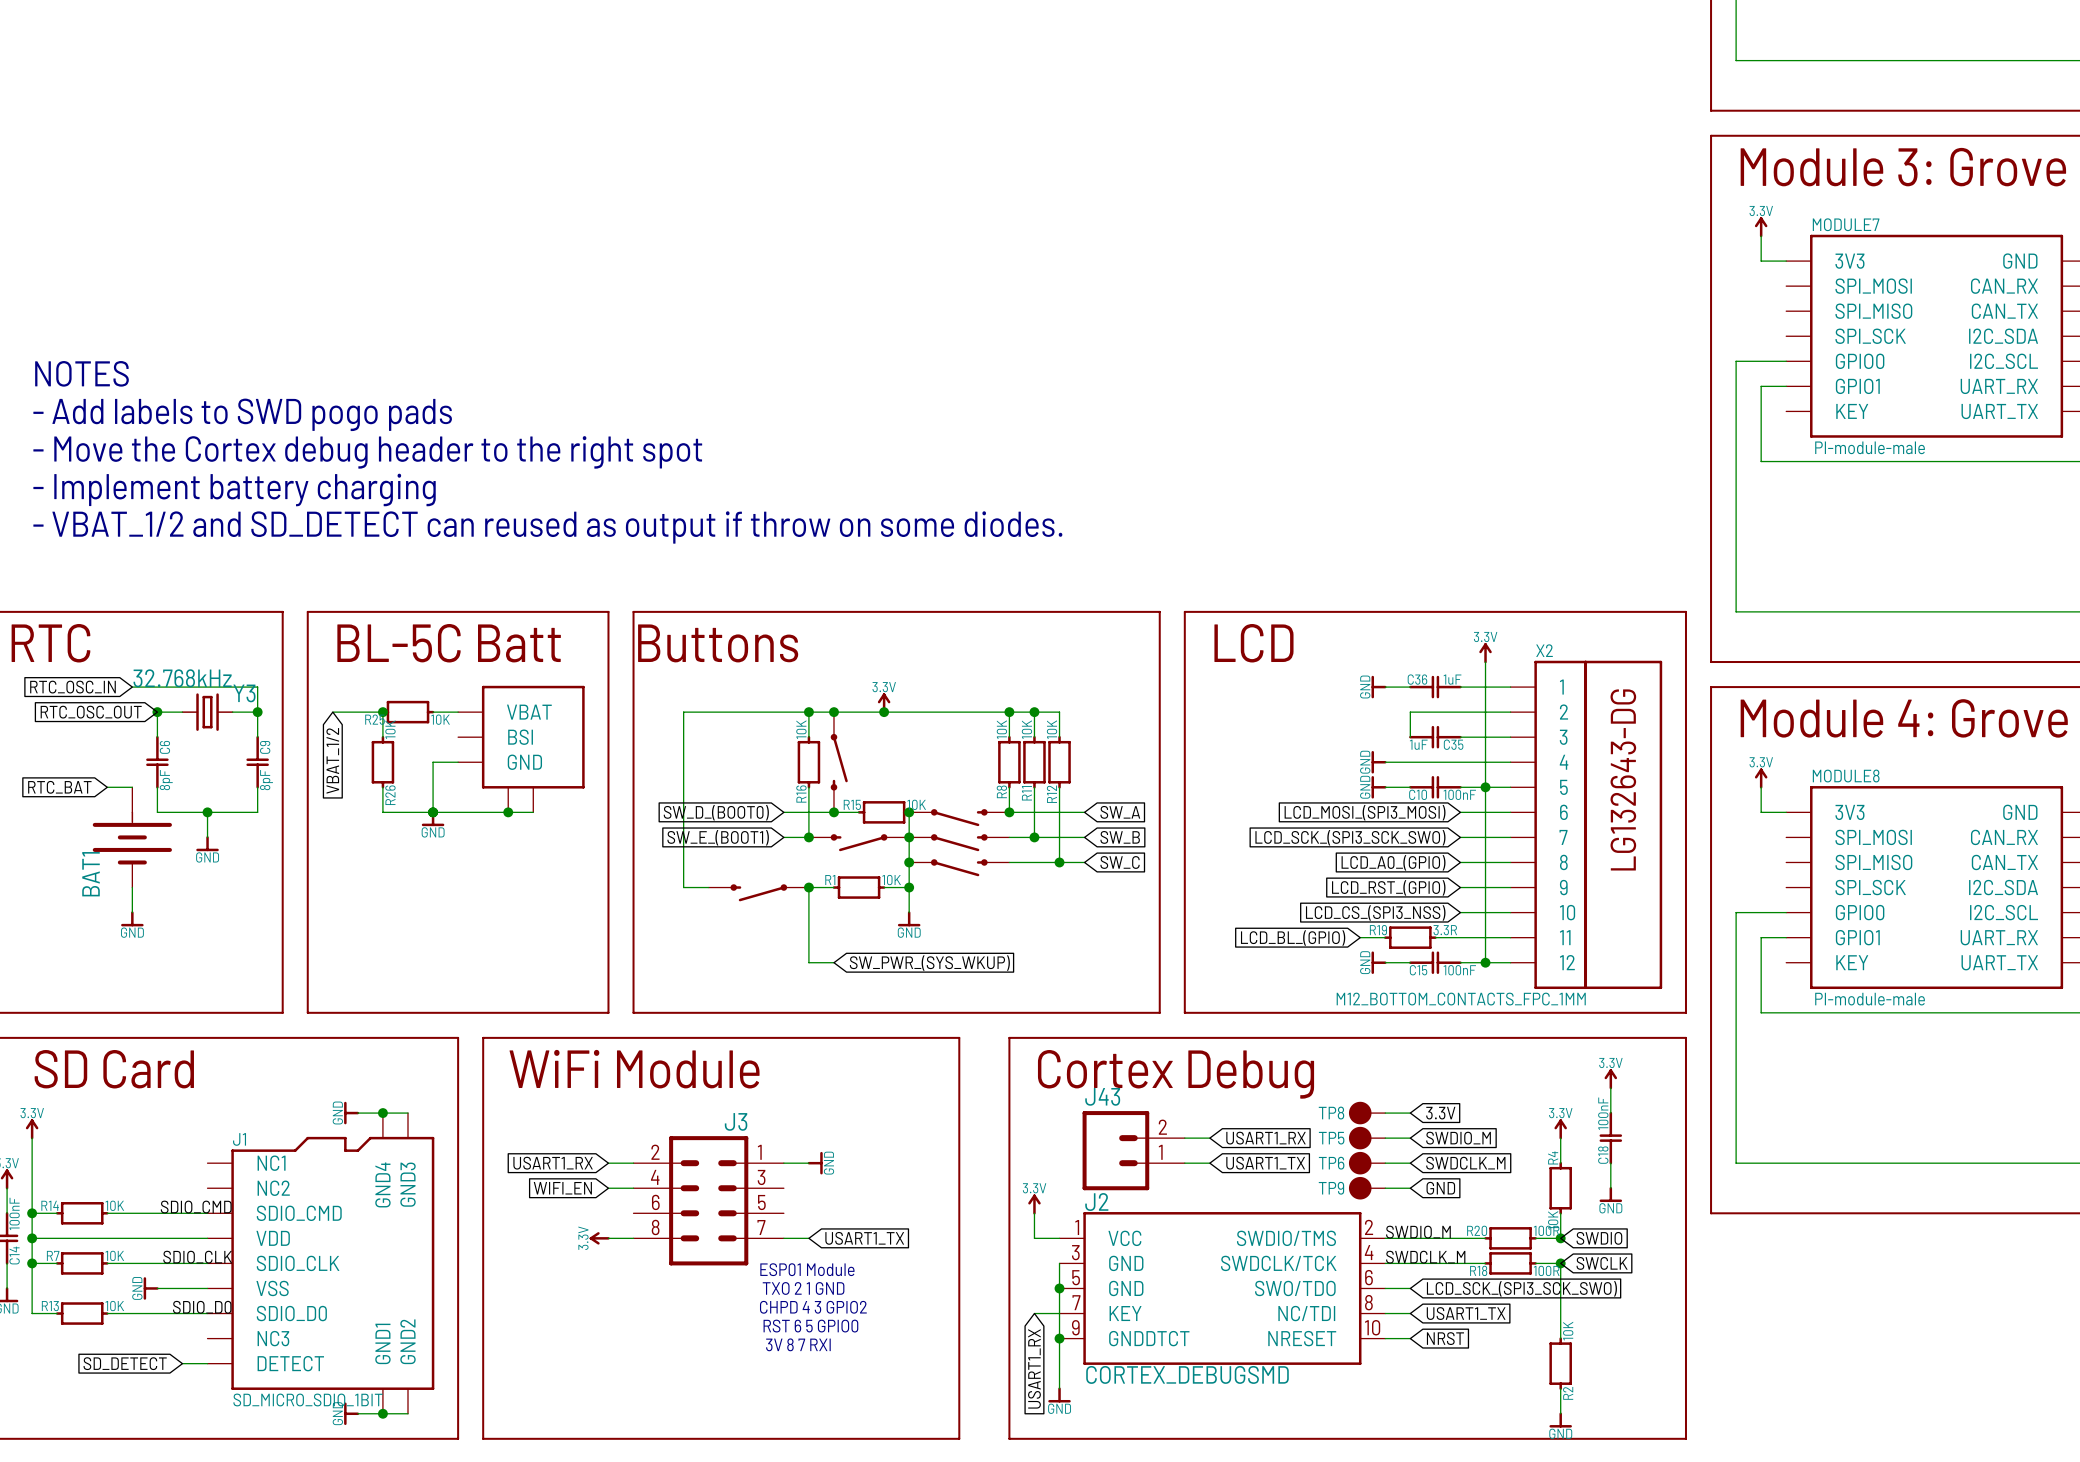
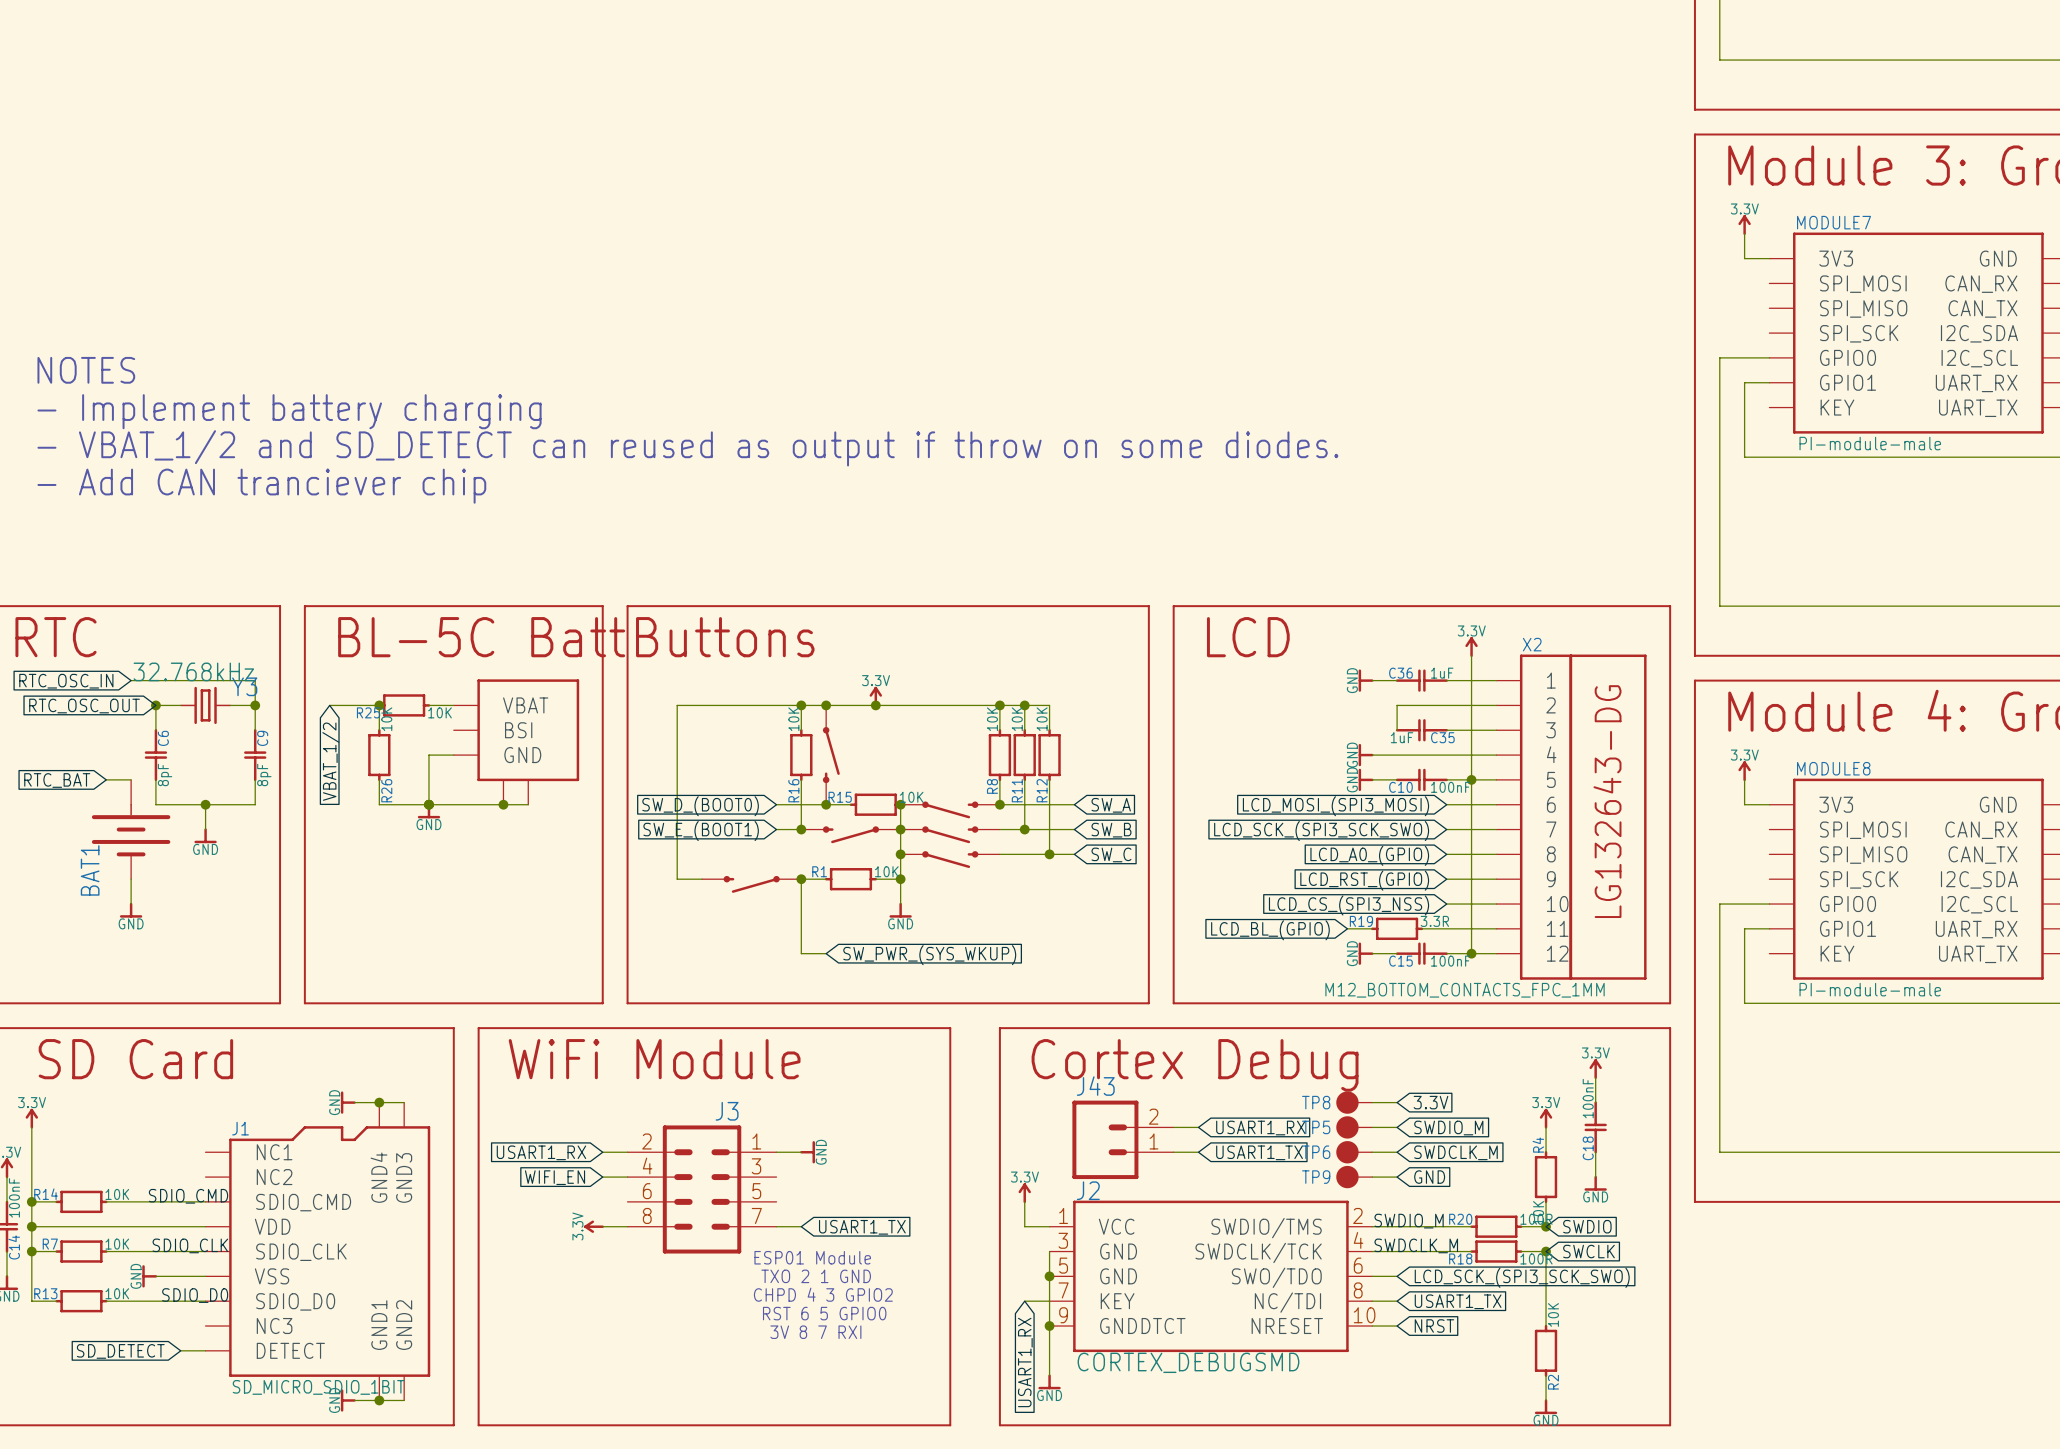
text: - Add labels to SWD pogo pads (242, 414) -> - Implement battery charging (289, 411)
text: - Move the Cortex debug header to the right spot (367, 452) -> - VBAT_1/2 and SD_DETECT can reused as output if throw on some diodes. (687, 448)
text: - Implement battery charging (234, 490) -> - Add CAN tranciever chip (261, 486)
text: - VBAT_1/2 and SD_DETECT can reused as output if throw on some diodes. (547, 527) -> none

